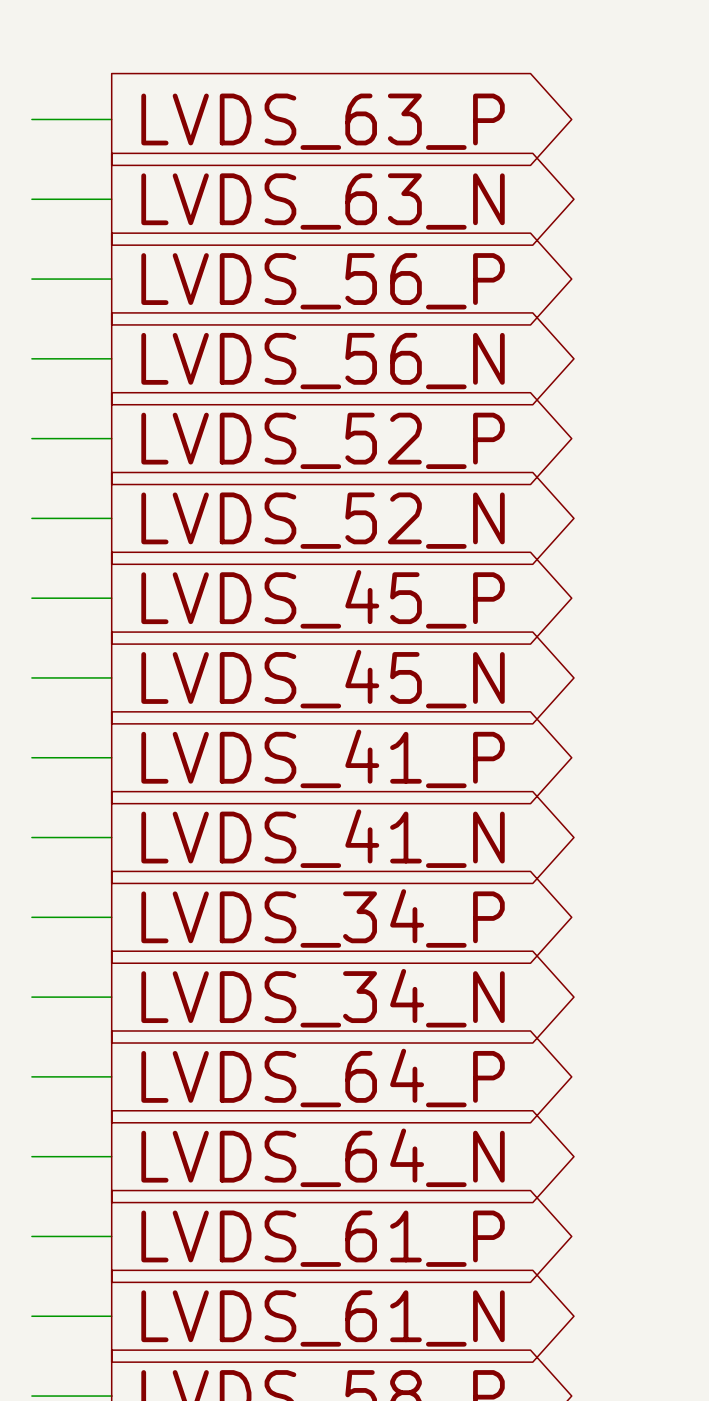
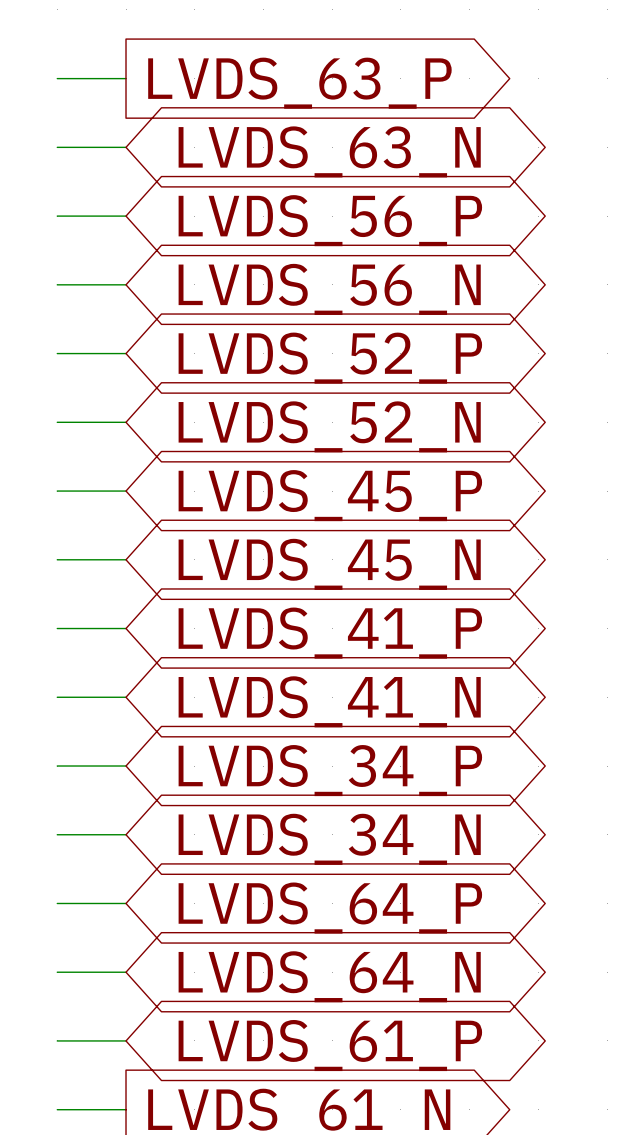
global label shape: output (323, 201) -> bidirectional (329, 151)
global label shape: output (323, 281) -> bidirectional (330, 220)
global label shape: output (323, 361) -> bidirectional (329, 289)
global label shape: output (323, 440) -> bidirectional (330, 358)
global label shape: output (323, 520) -> bidirectional (329, 426)
global label shape: output (323, 599) -> bidirectional (330, 495)
global label shape: output (323, 679) -> bidirectional (329, 564)
global label shape: output (323, 758) -> bidirectional (330, 633)
global label shape: output (323, 838) -> bidirectional (329, 701)
global label shape: output (323, 918) -> bidirectional (330, 770)
global label shape: output (323, 998) -> bidirectional (329, 839)
global label shape: output (323, 1078) -> bidirectional (330, 908)
global label shape: output (323, 1157) -> bidirectional (329, 976)
global label shape: output (323, 1238) -> bidirectional (330, 1045)

